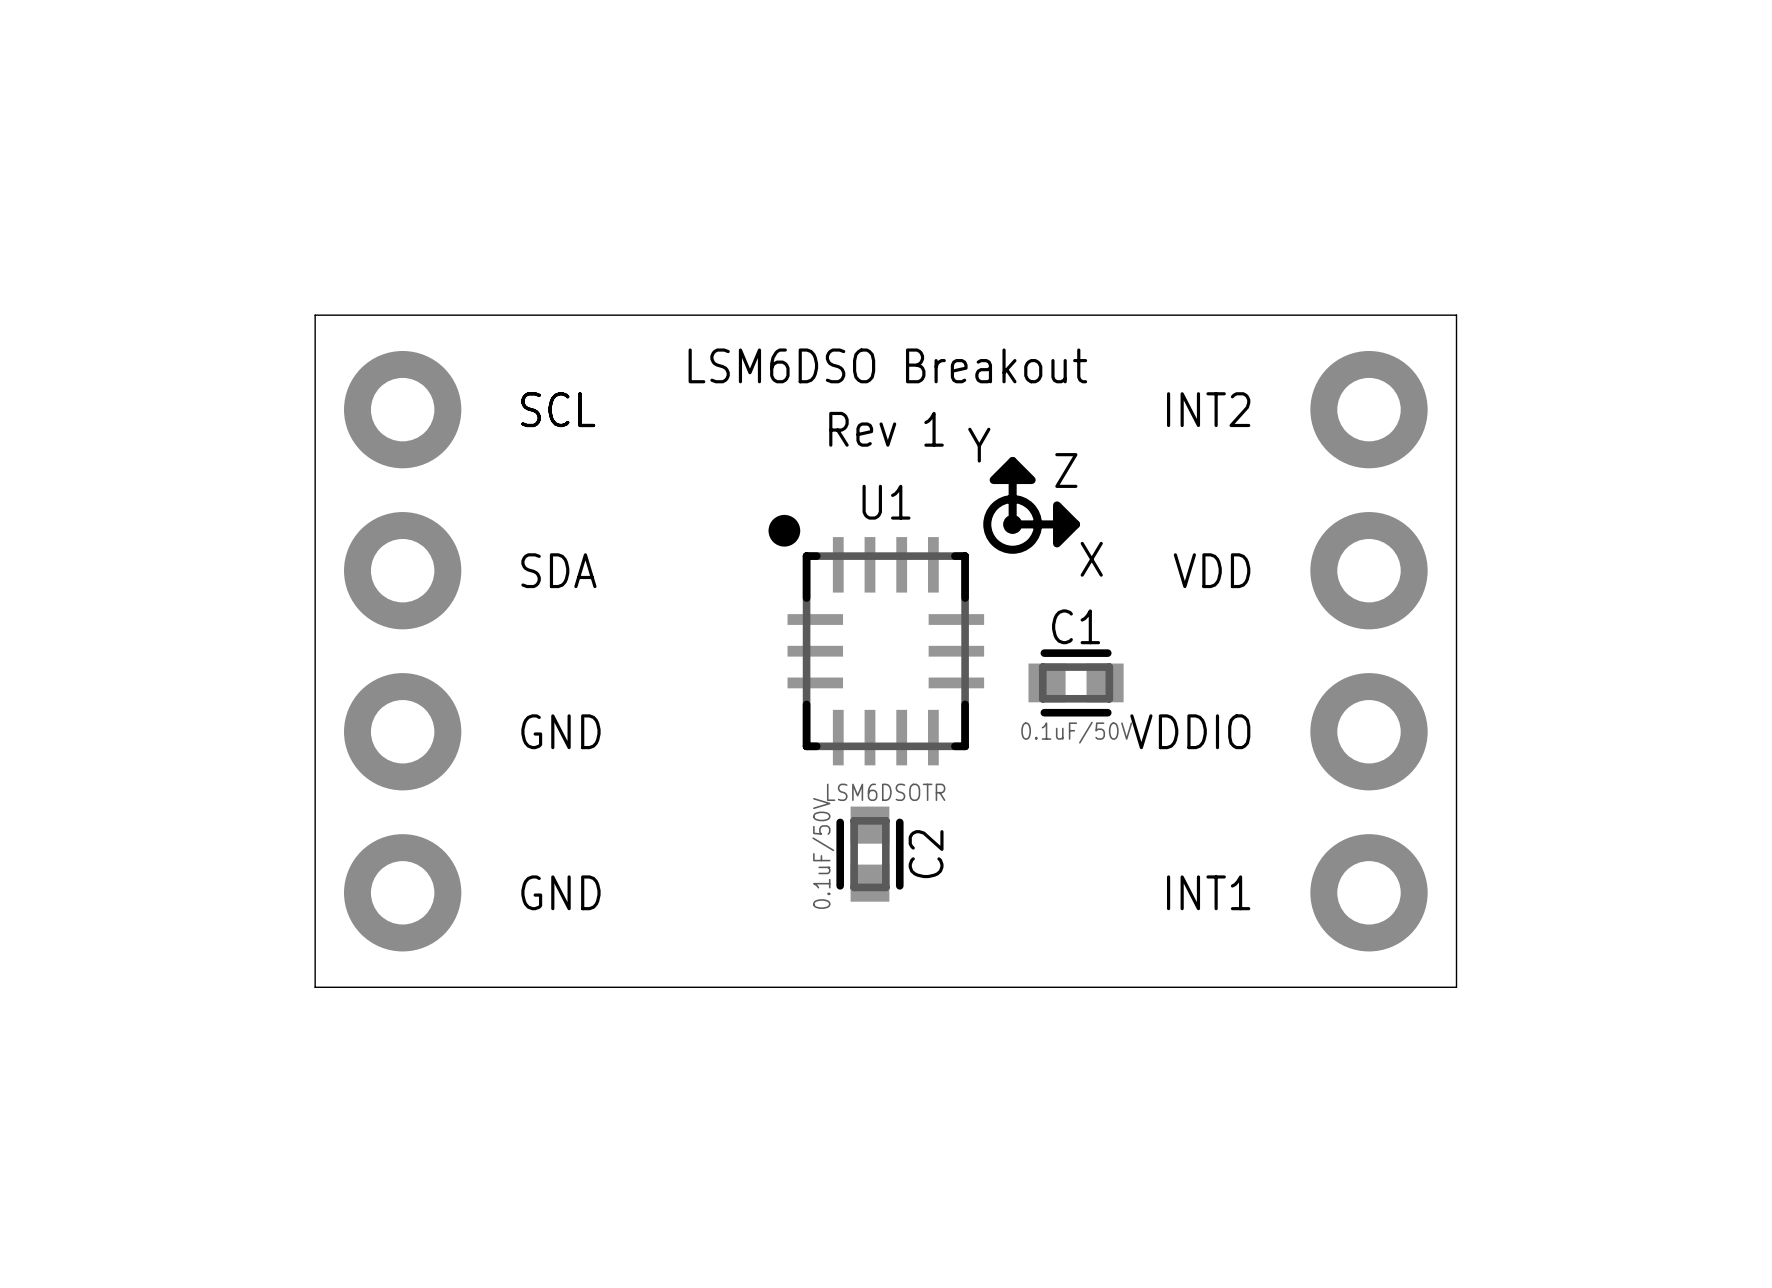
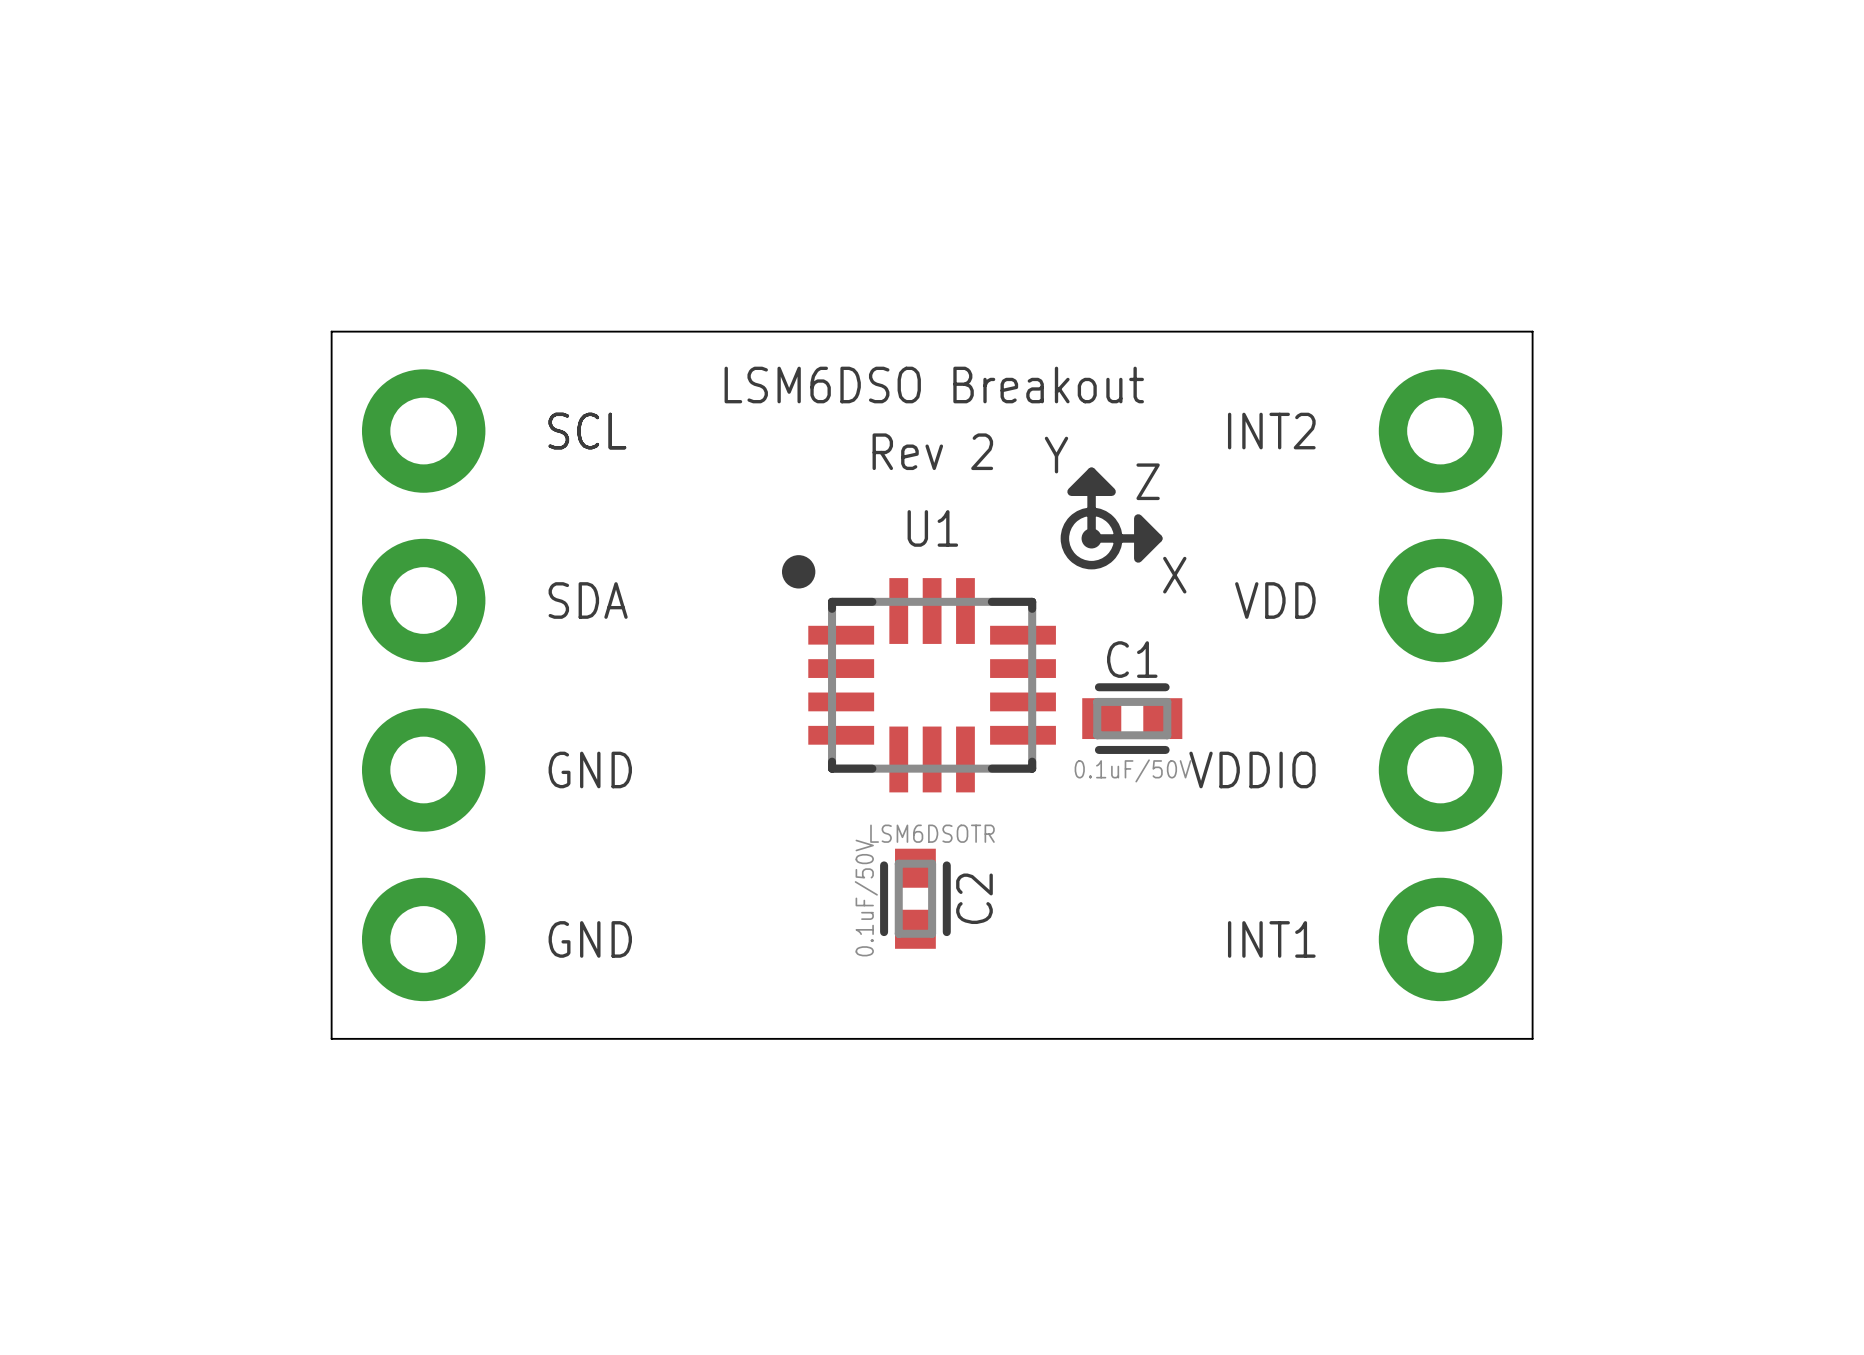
text: Rev 1 (886, 429) -> Rev 2 (932, 451)
U1 footprint: [768, 456, 1081, 766] -> [781, 467, 1163, 793]

